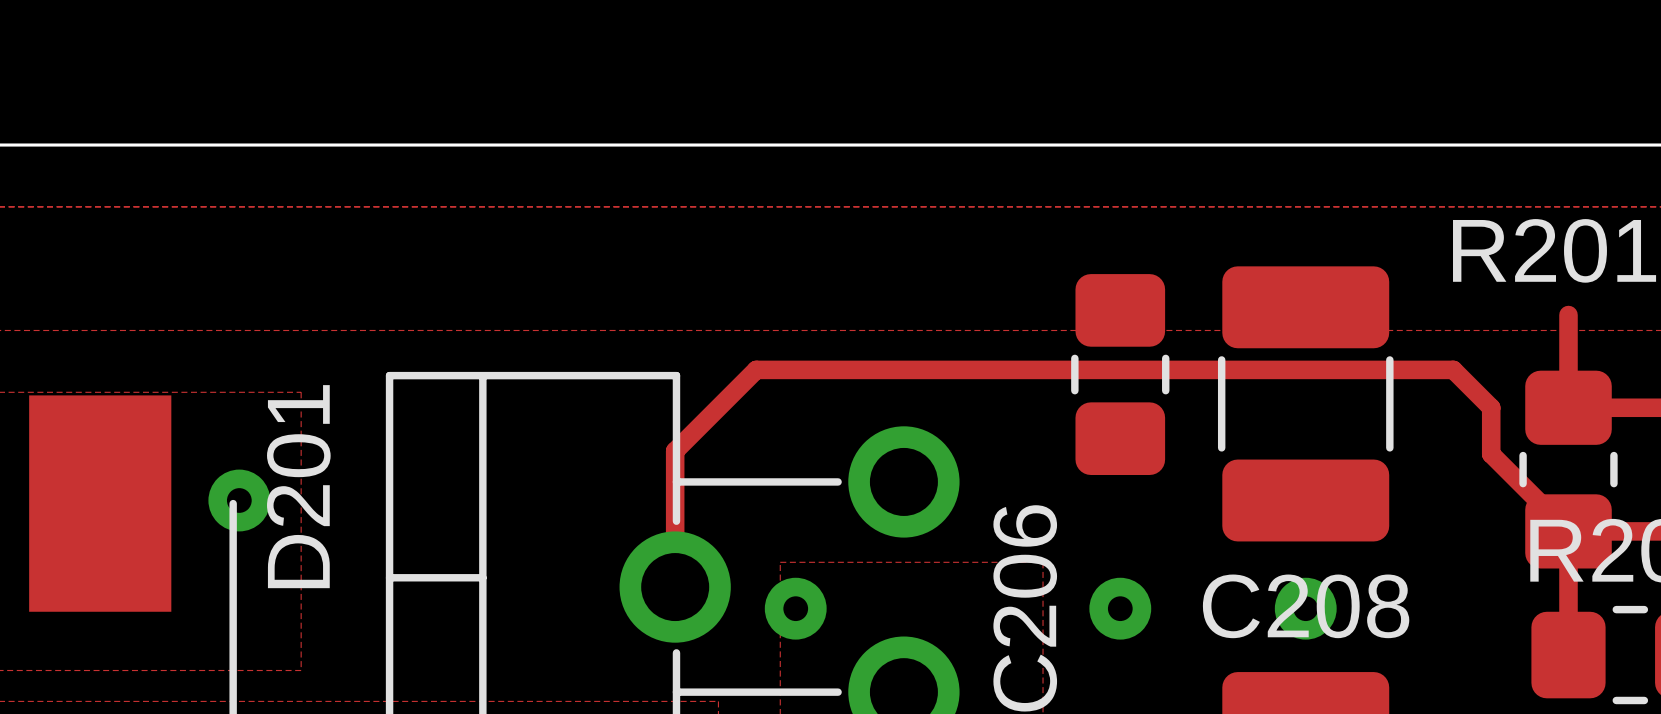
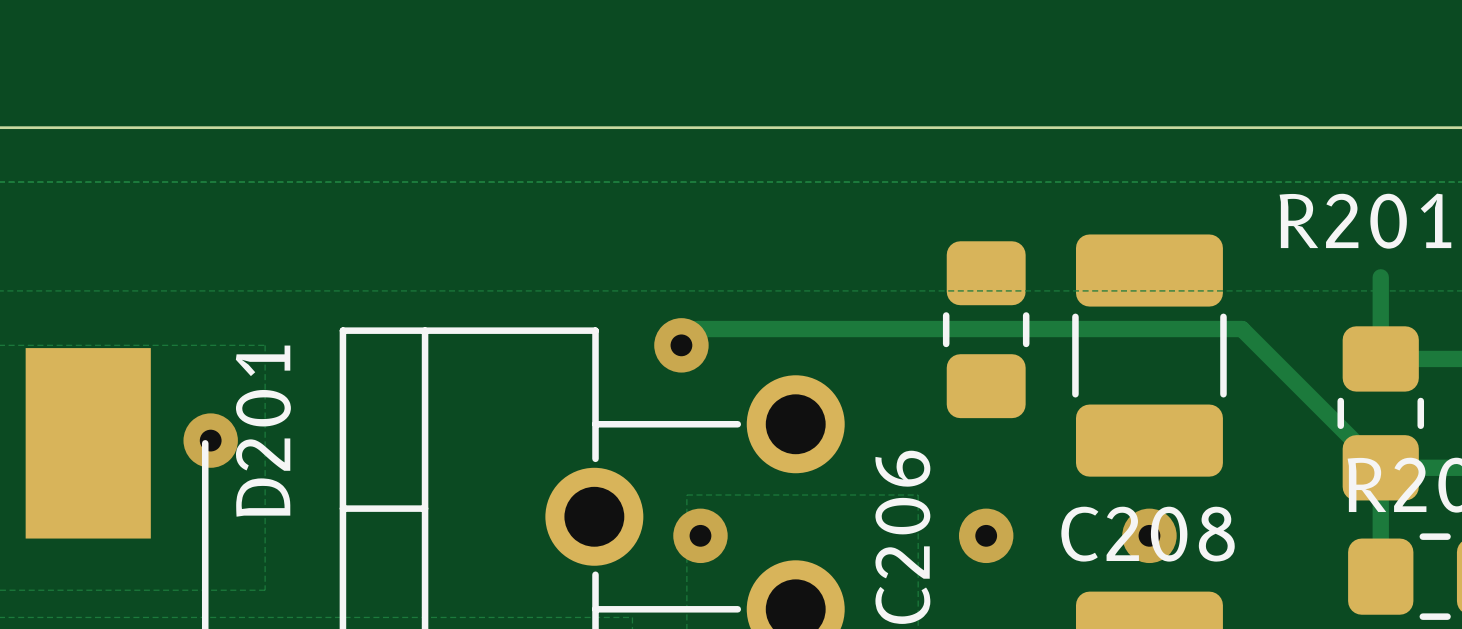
via: none -> (681, 345)
track: (1491, 454) (1491, 407) (1453, 369) (756, 369) (675, 451) (675, 587) -> (1312, 399) (1241, 329) (697, 329) (681, 345)

